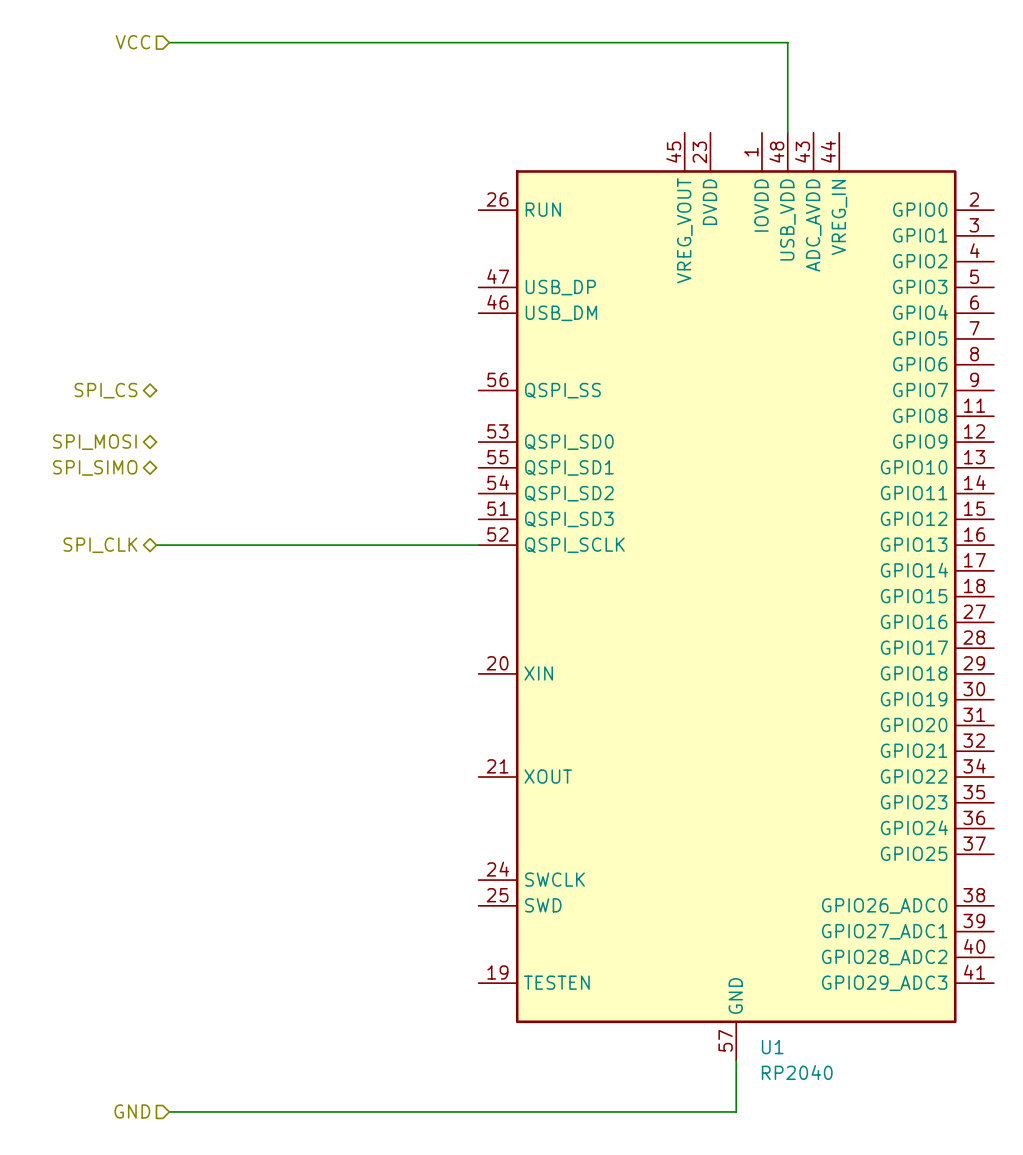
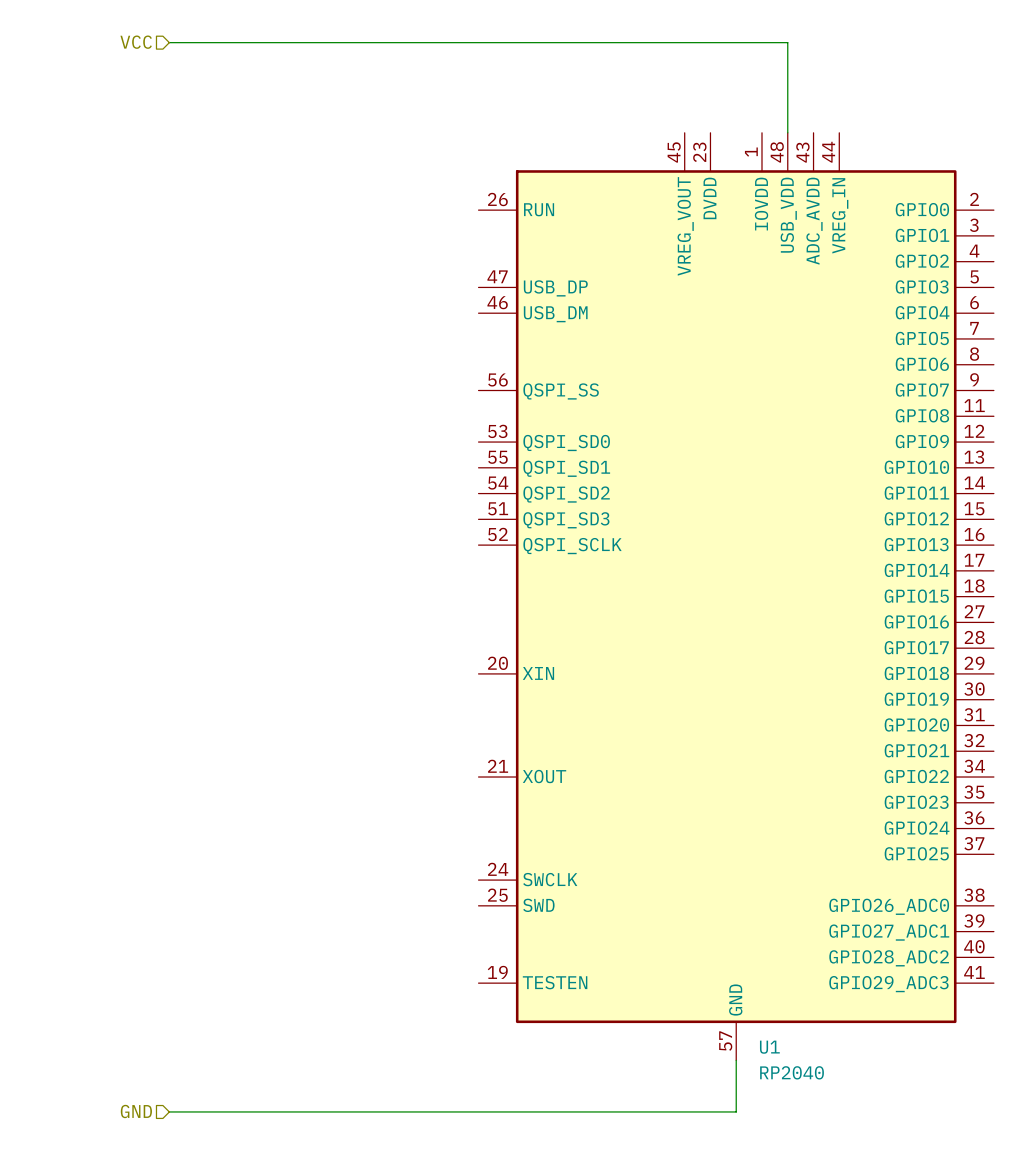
hierarchical label: SPI_CS (105, 390) -> none
hierarchical label: SPI_MOSI (94, 442) -> none
hierarchical label: SPI_SIMO (95, 467) -> none
hierarchical label: SPI_CLK (100, 545) -> none
wire: (156, 545) (478, 545) -> none

